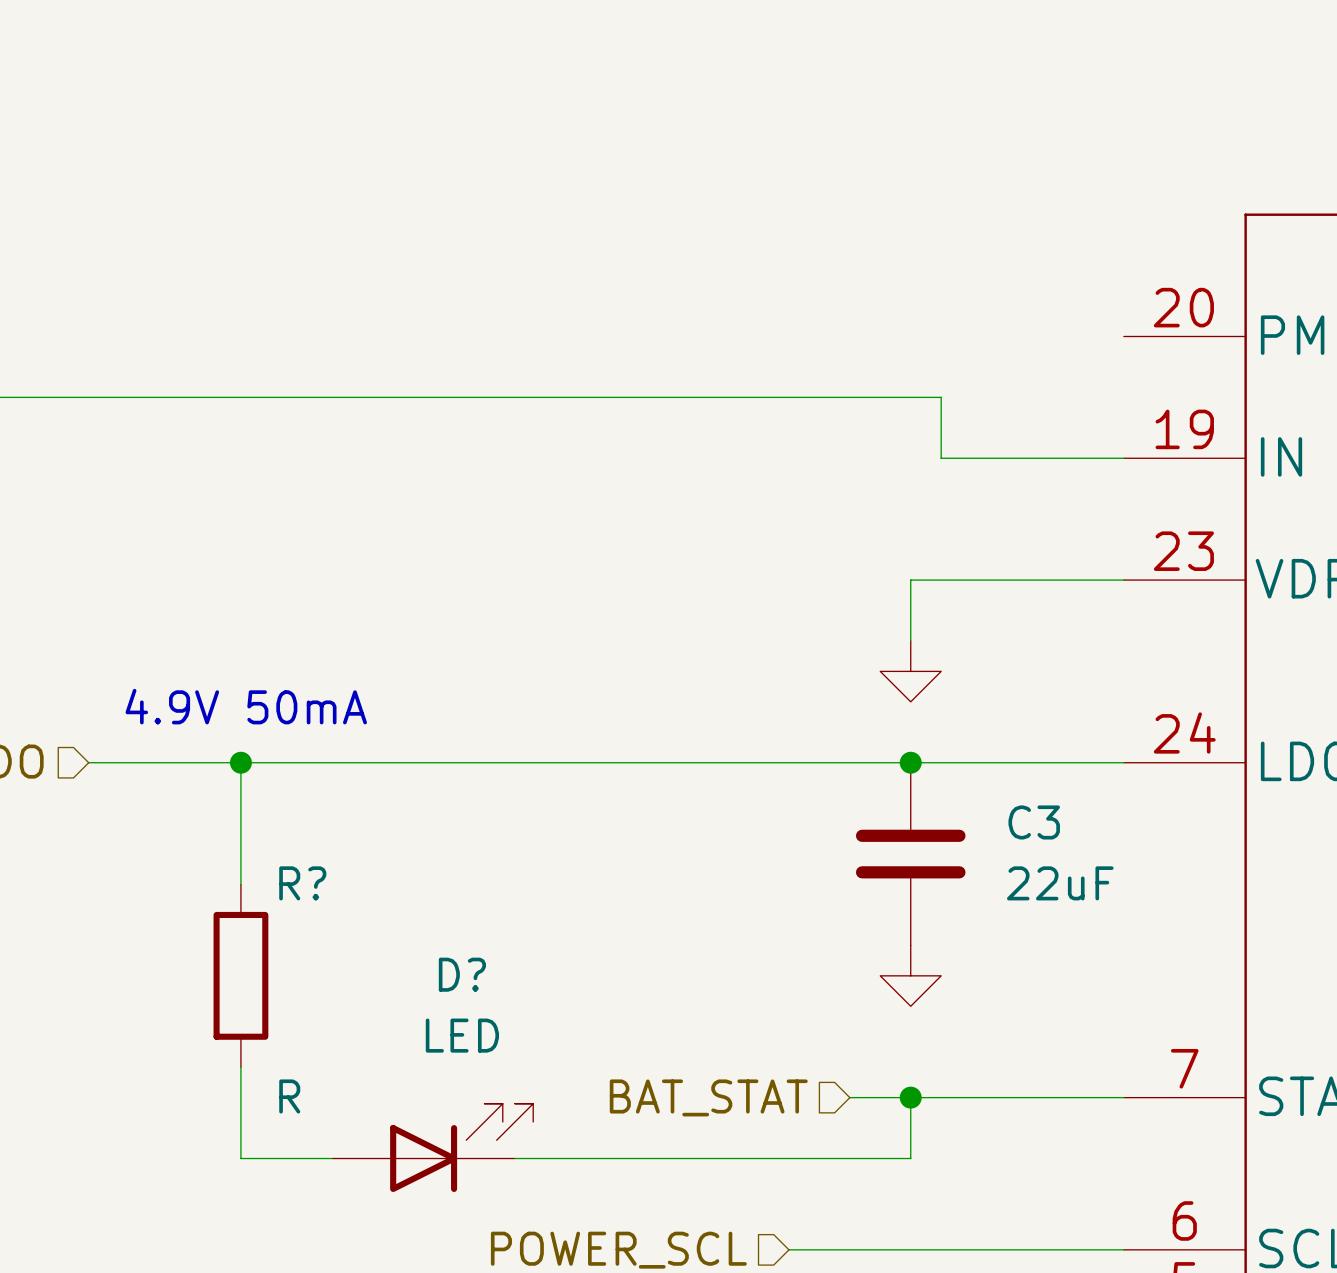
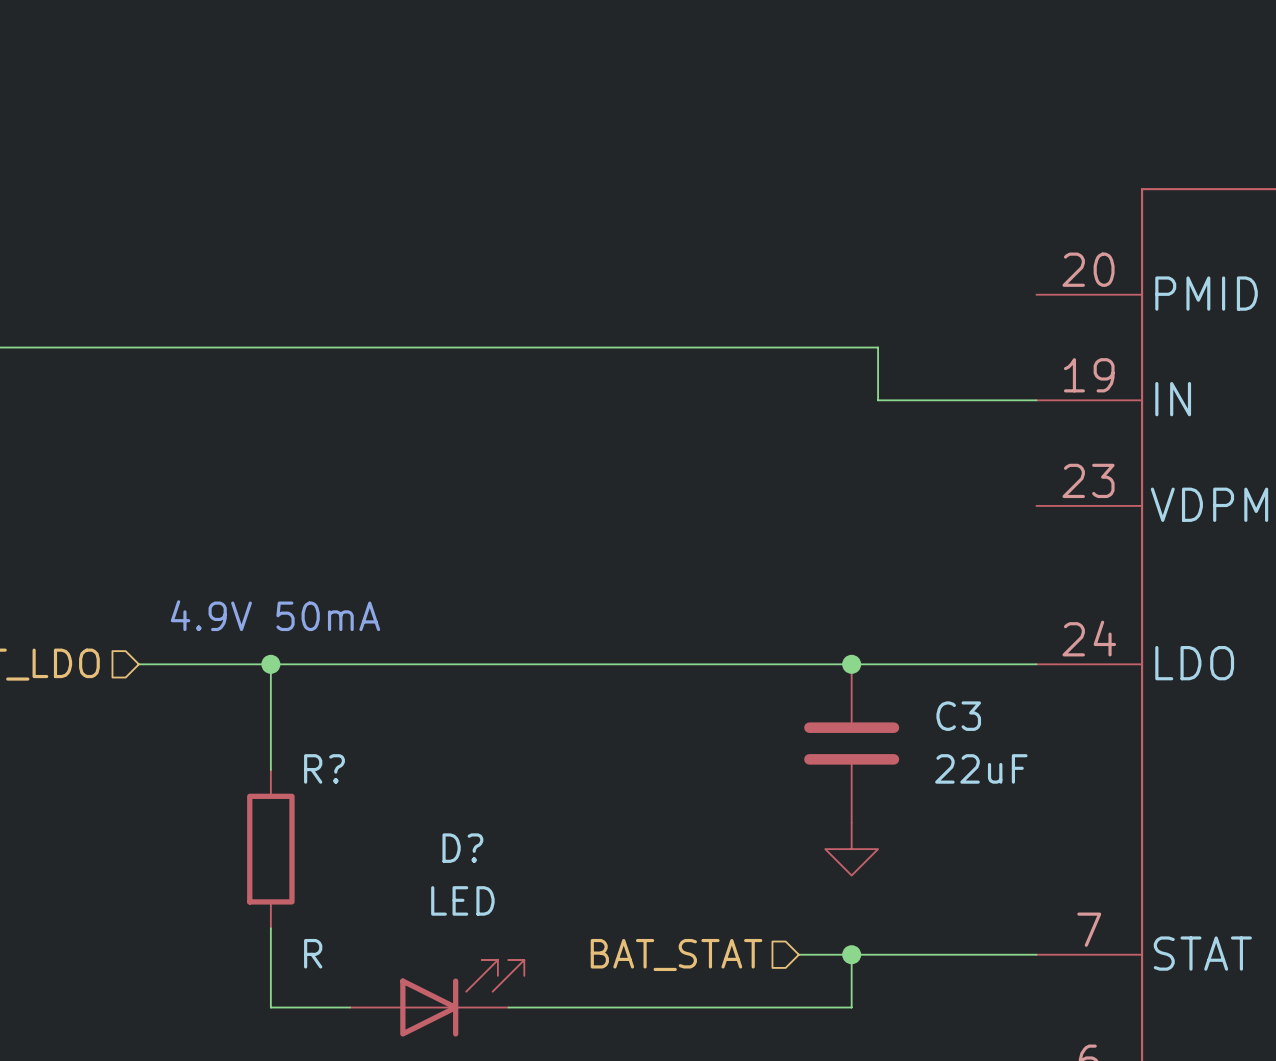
wire: (1123, 580) (910, 580) (910, 640) -> none
power symbol: (910, 671) -> none

